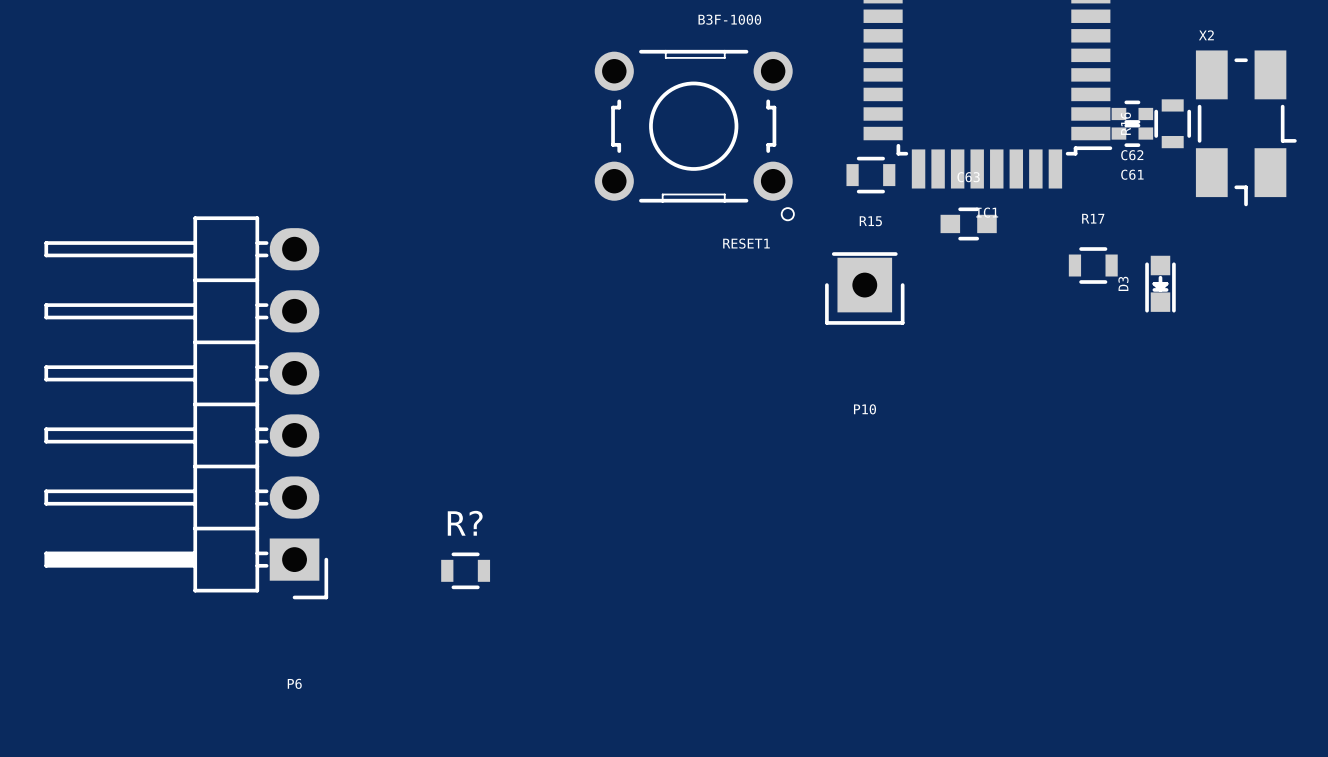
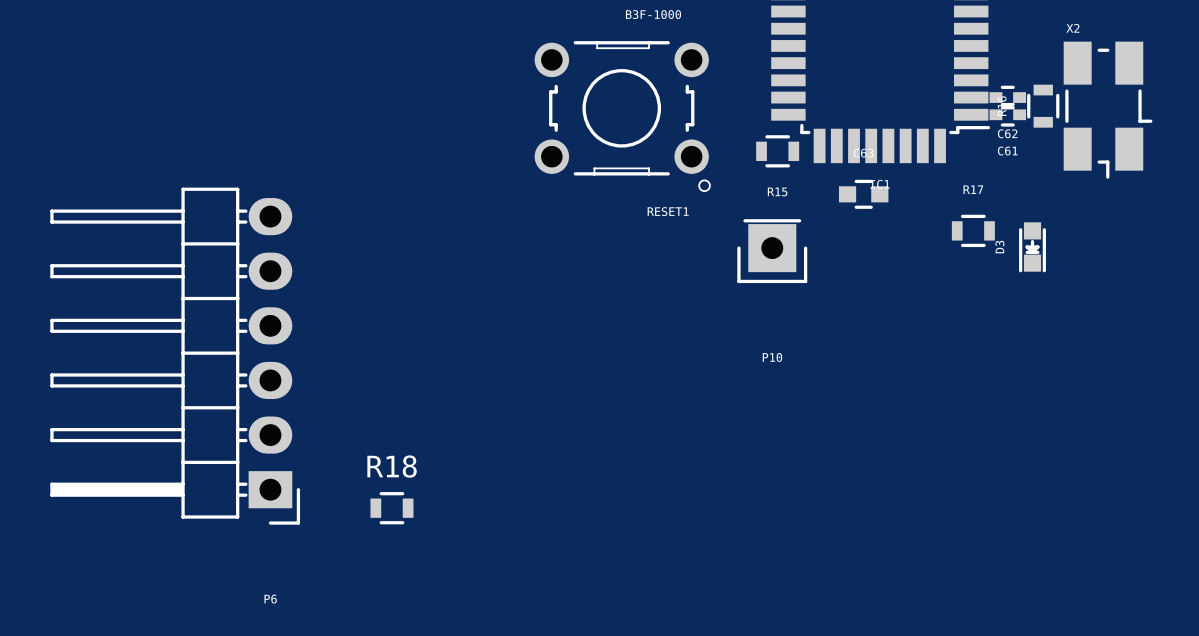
R?: (465, 570) -> none
R18: none -> (391, 508)

